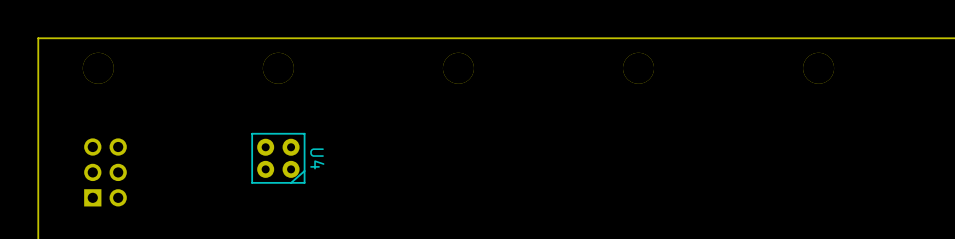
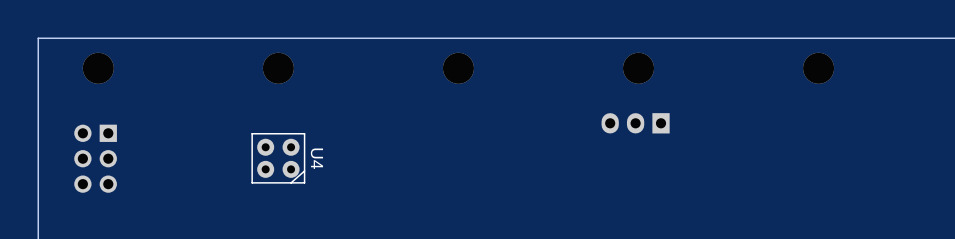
part: none -> (635, 123)
part rotation: 0° (105, 172) -> 180° (95, 158)

